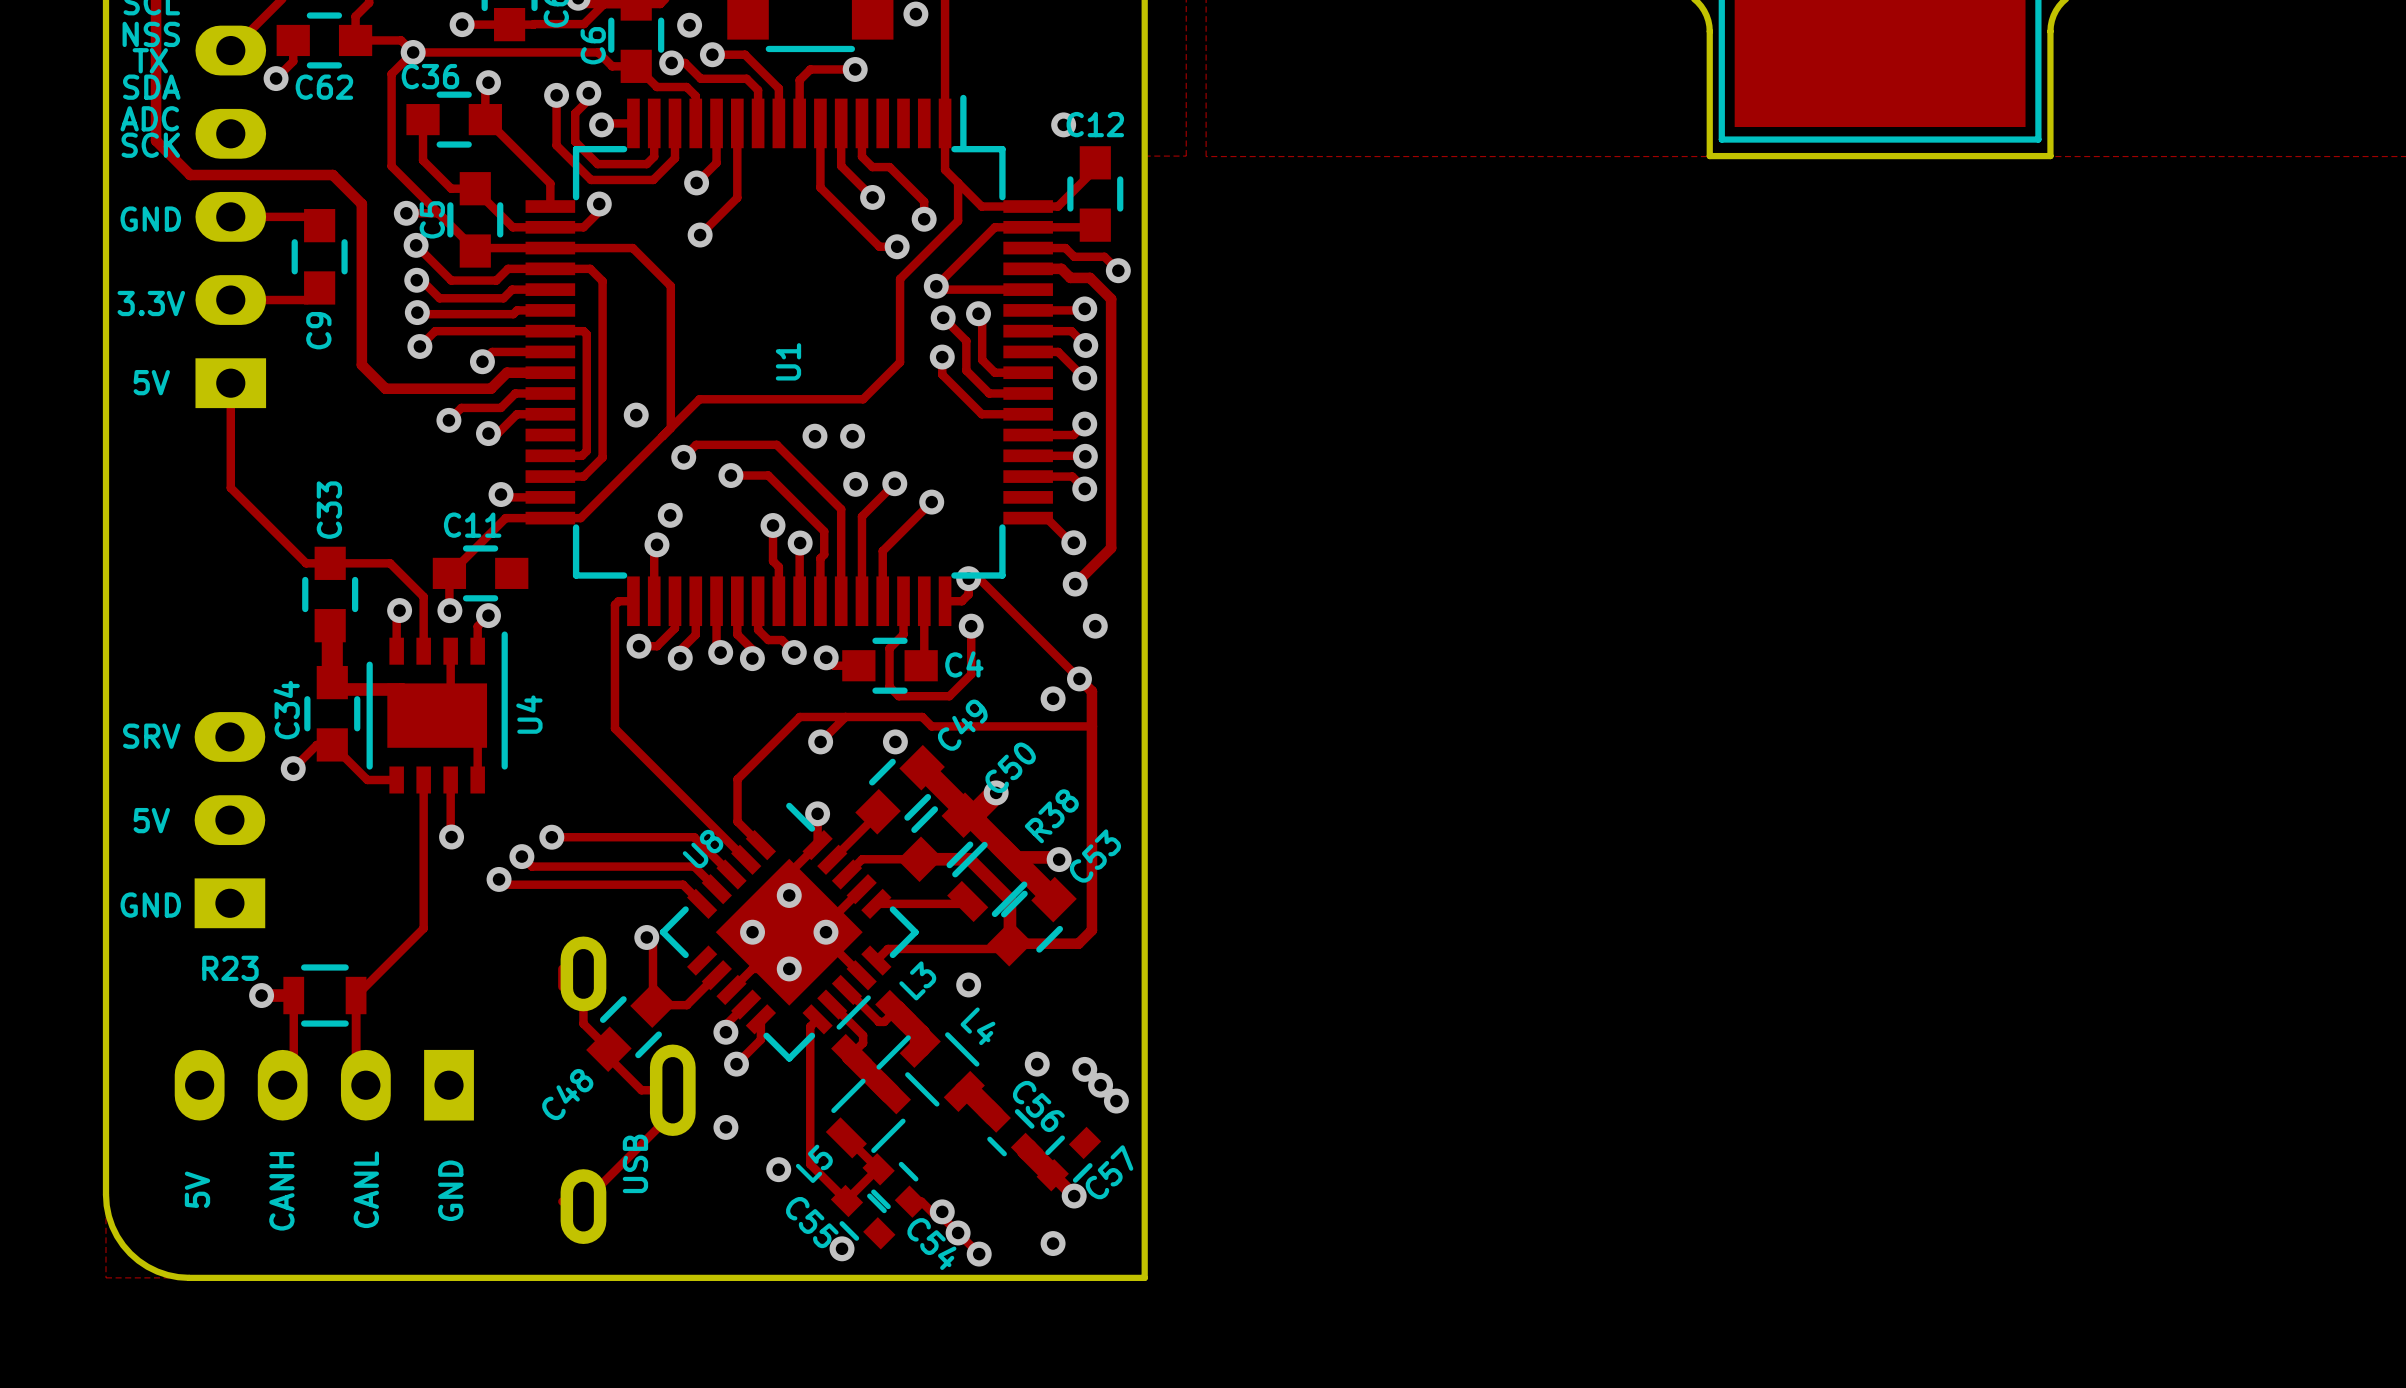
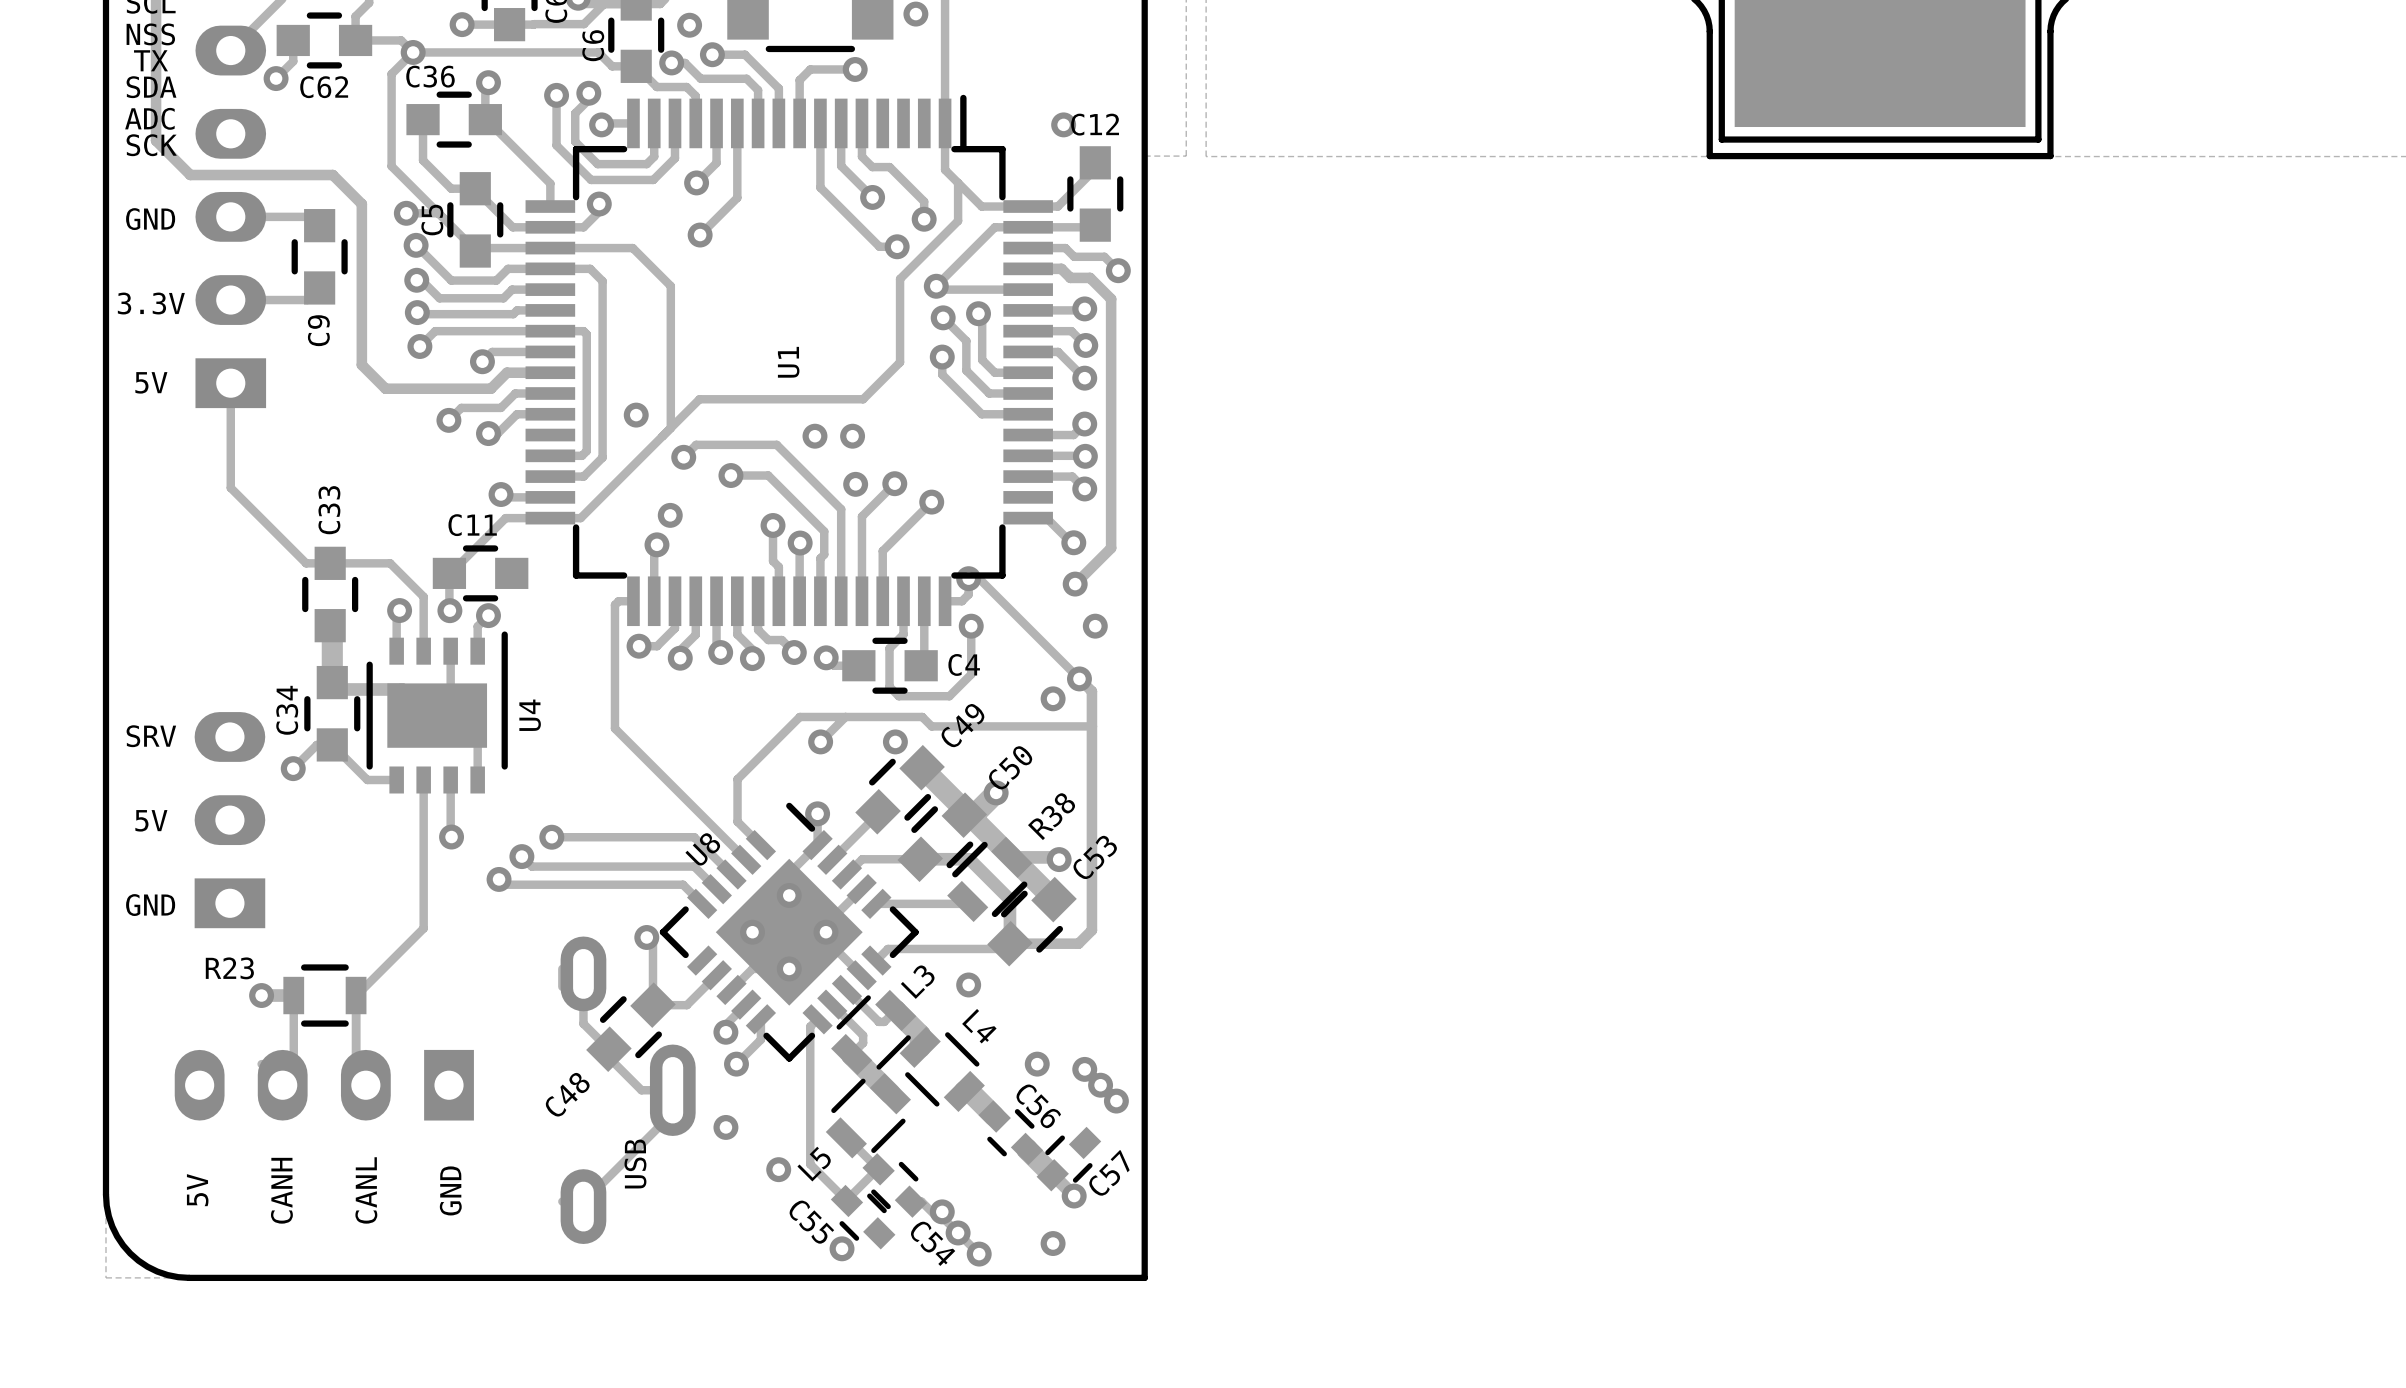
track: none -> (261, 1064) (293, 1064)

